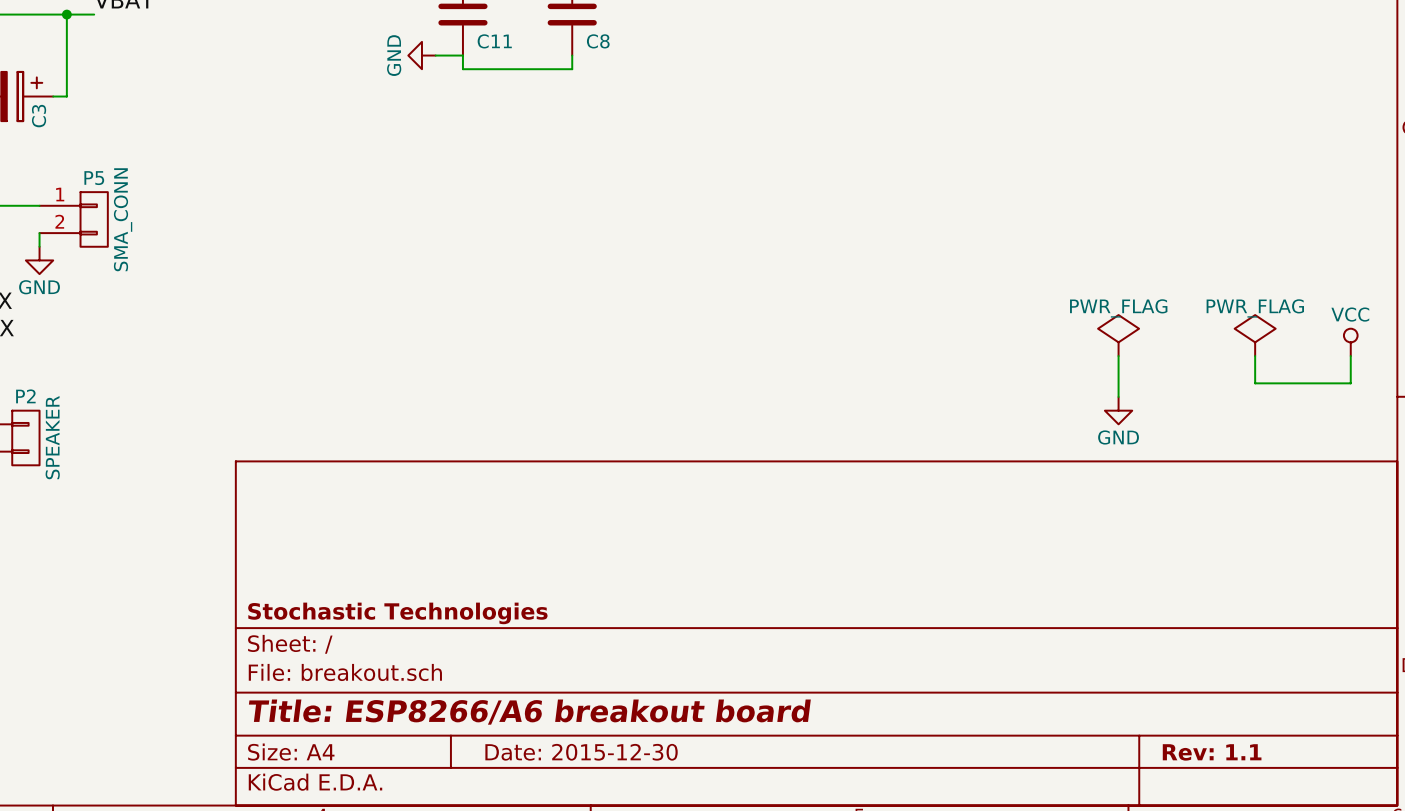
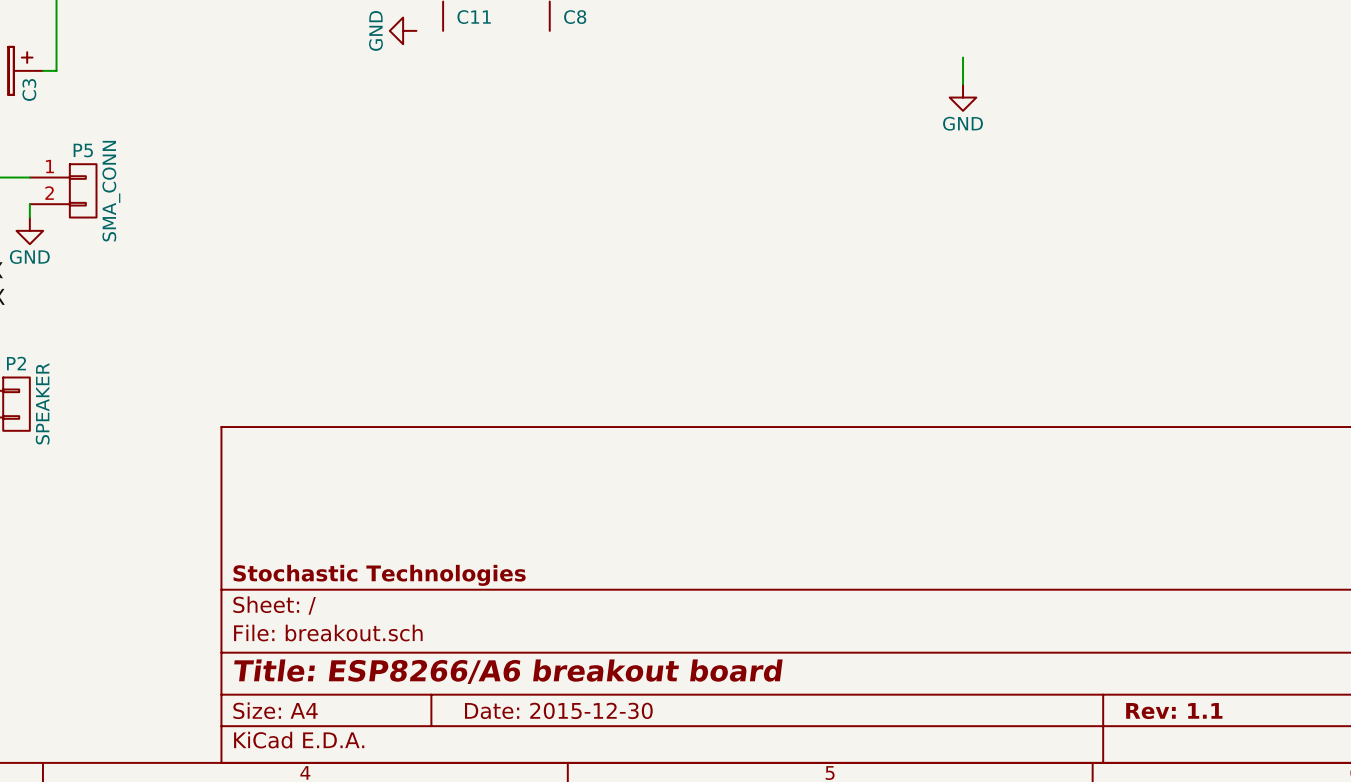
wire: (435, 55) (462, 55) (462, 69) (572, 69) (572, 55) -> none
wire: none -> (963, 57) (963, 84)
power symbol: none -> GND (963, 97)
power symbol: PWR_FLAG (1118, 335) -> none
power symbol: PWR_FLAG (1255, 335) -> none
power symbol: VCC (1350, 342) -> none
wire: (1118, 356) (1118, 397) -> none
wire: (1255, 356) (1255, 383) (1350, 383) (1350, 356) -> none
power symbol: GND (1118, 410) -> none

